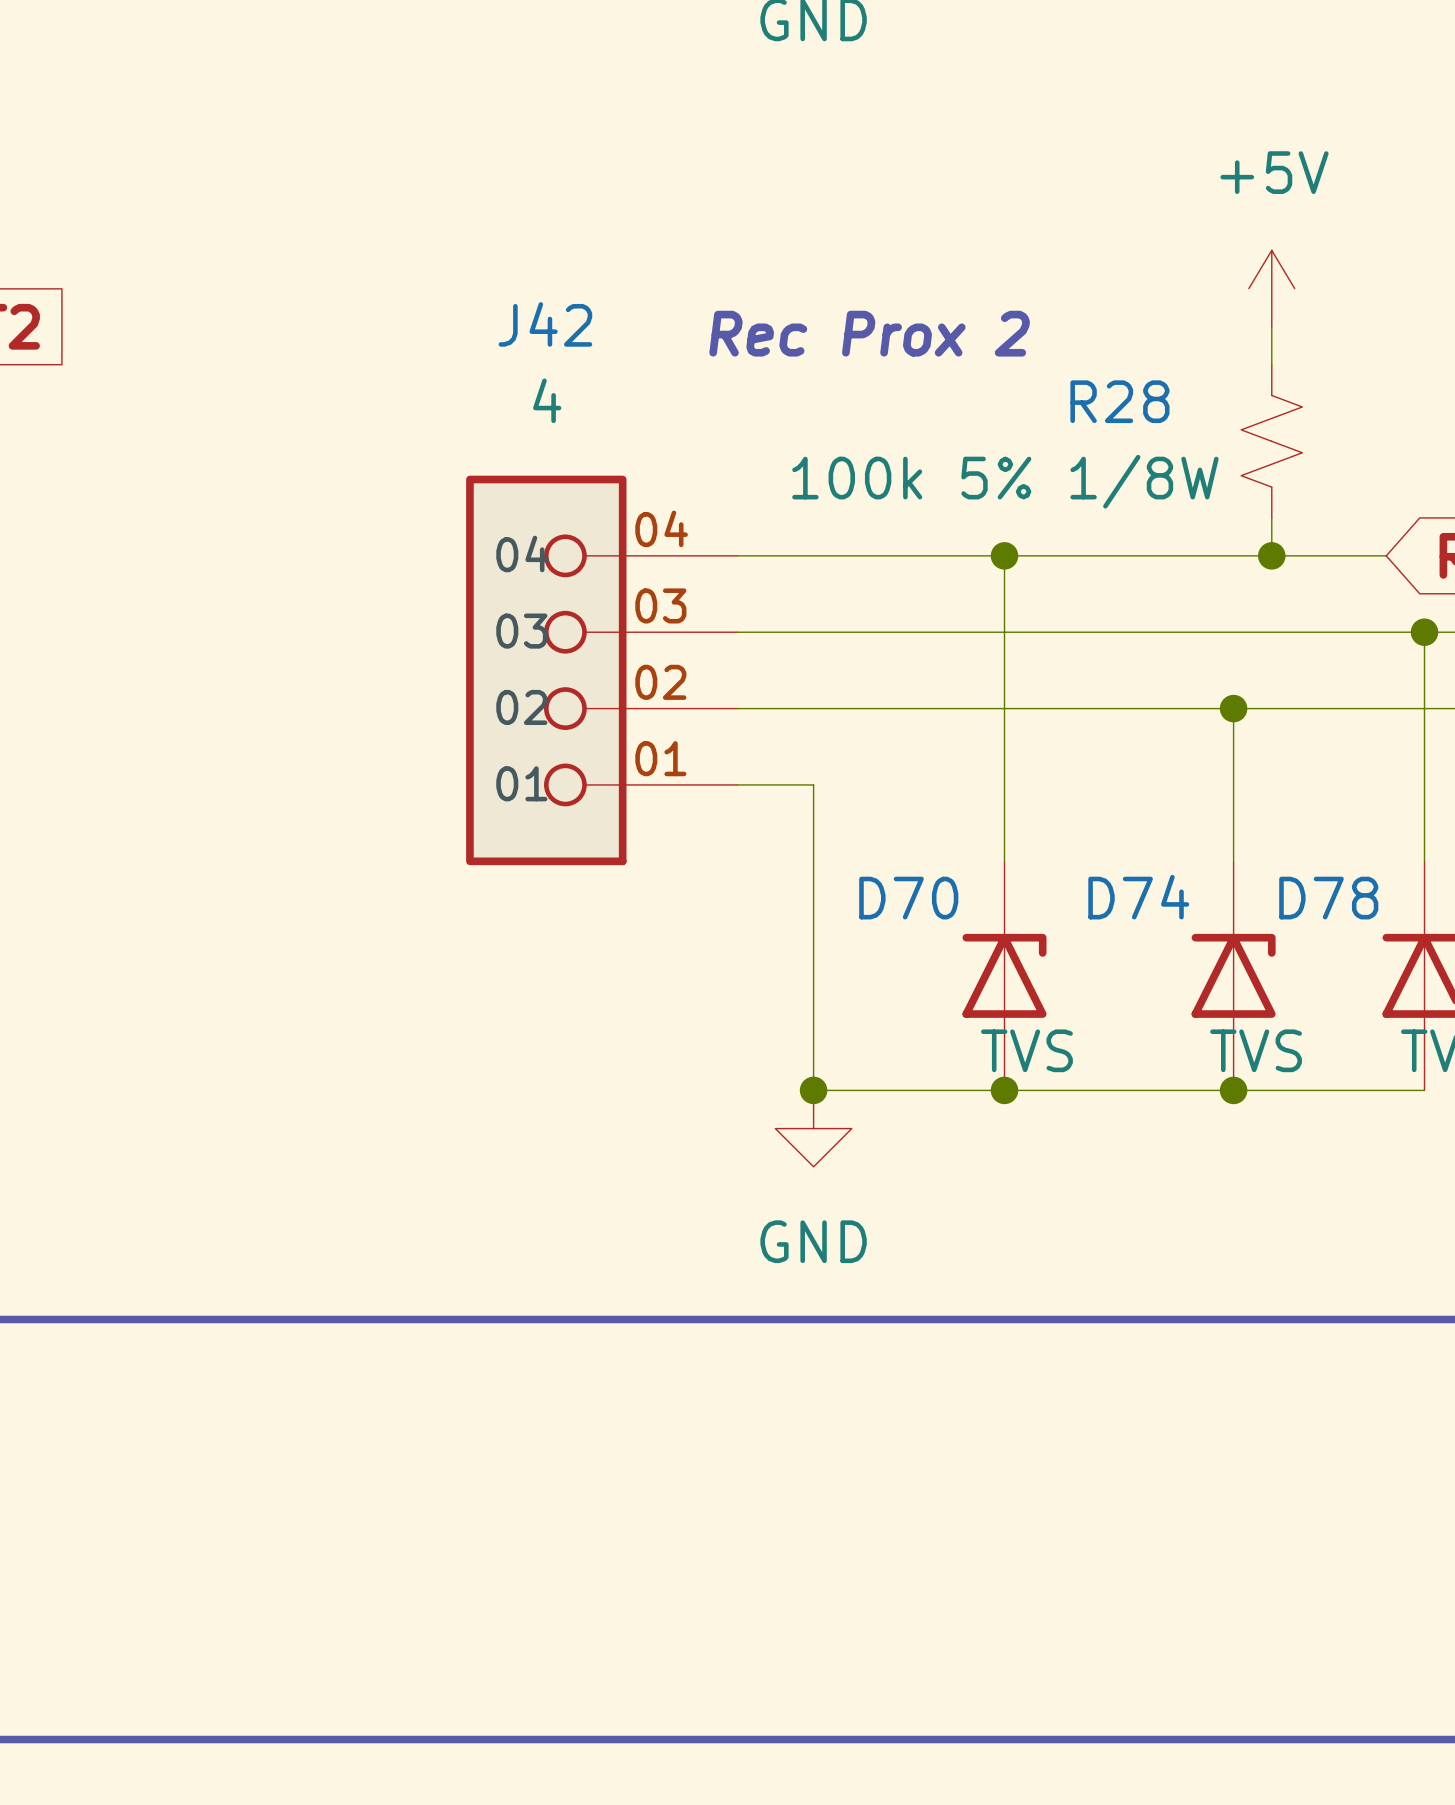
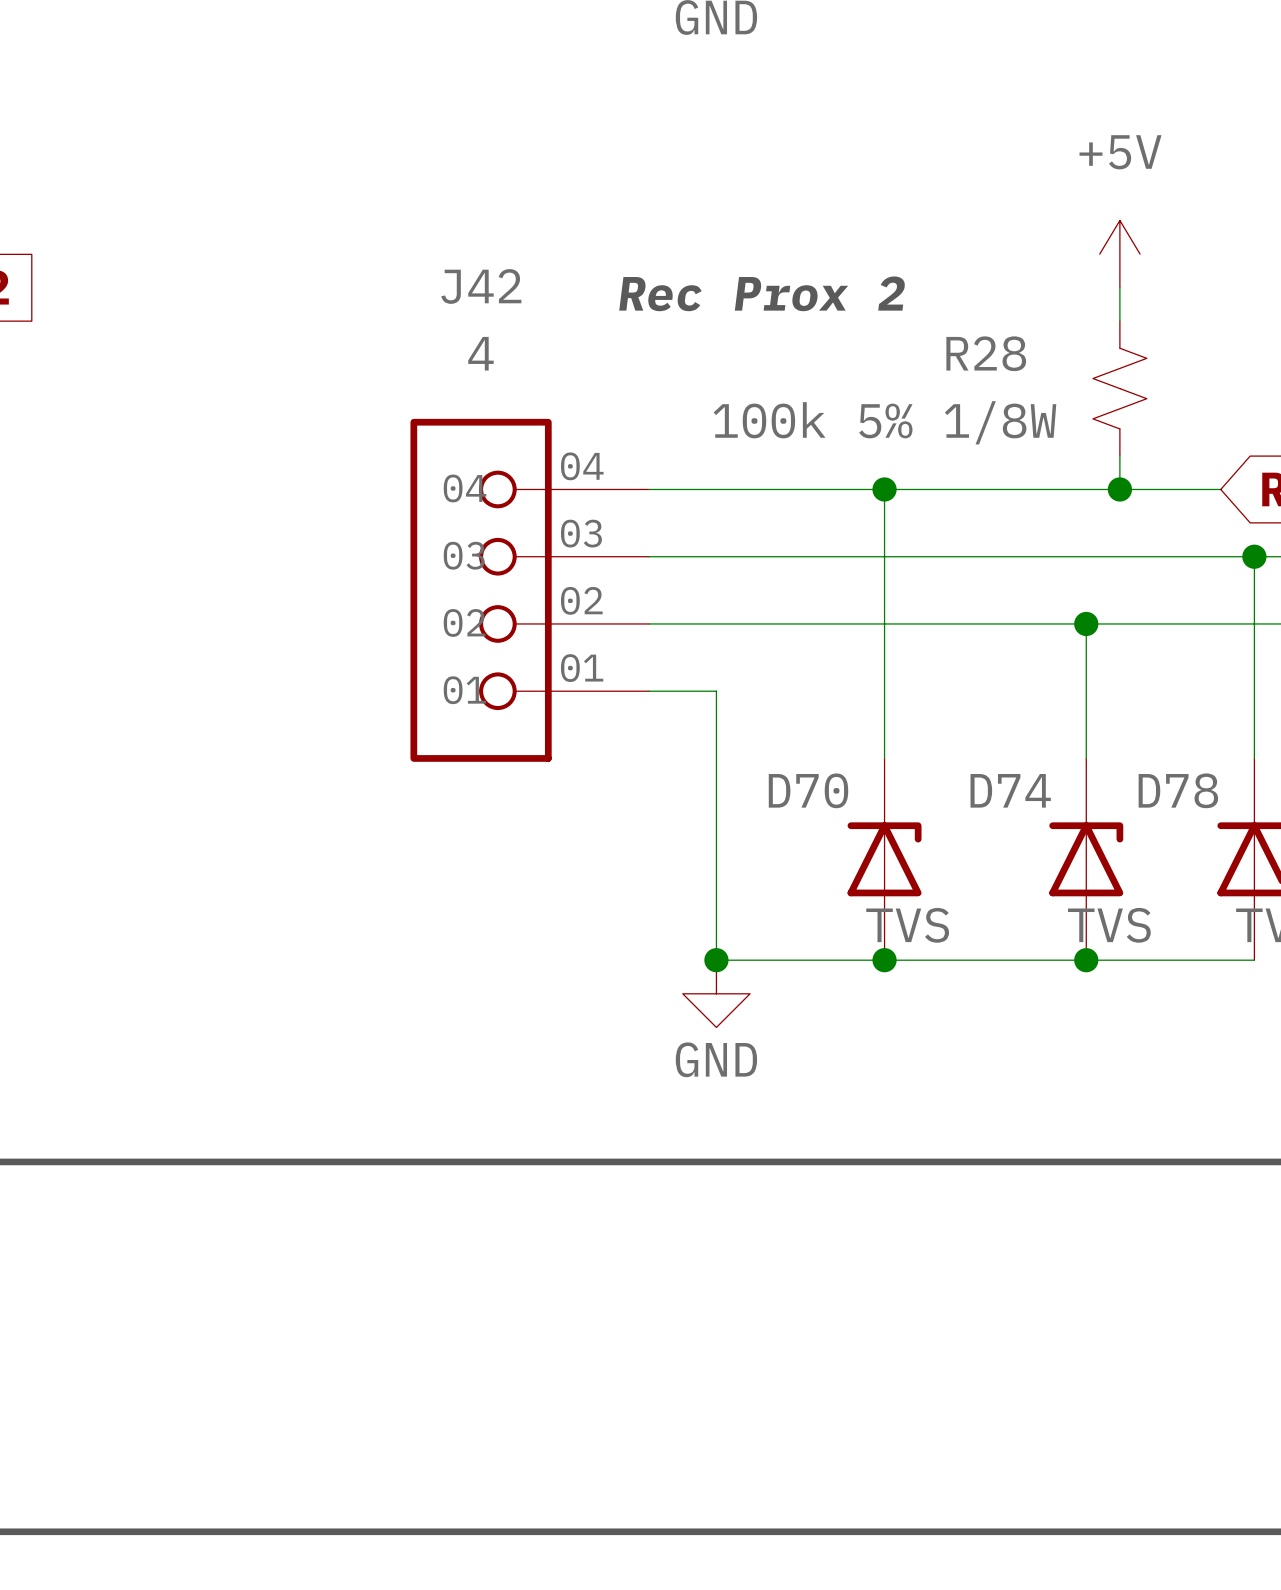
power symbol text position: GND (813, 1241) -> GND (716, 1059)

